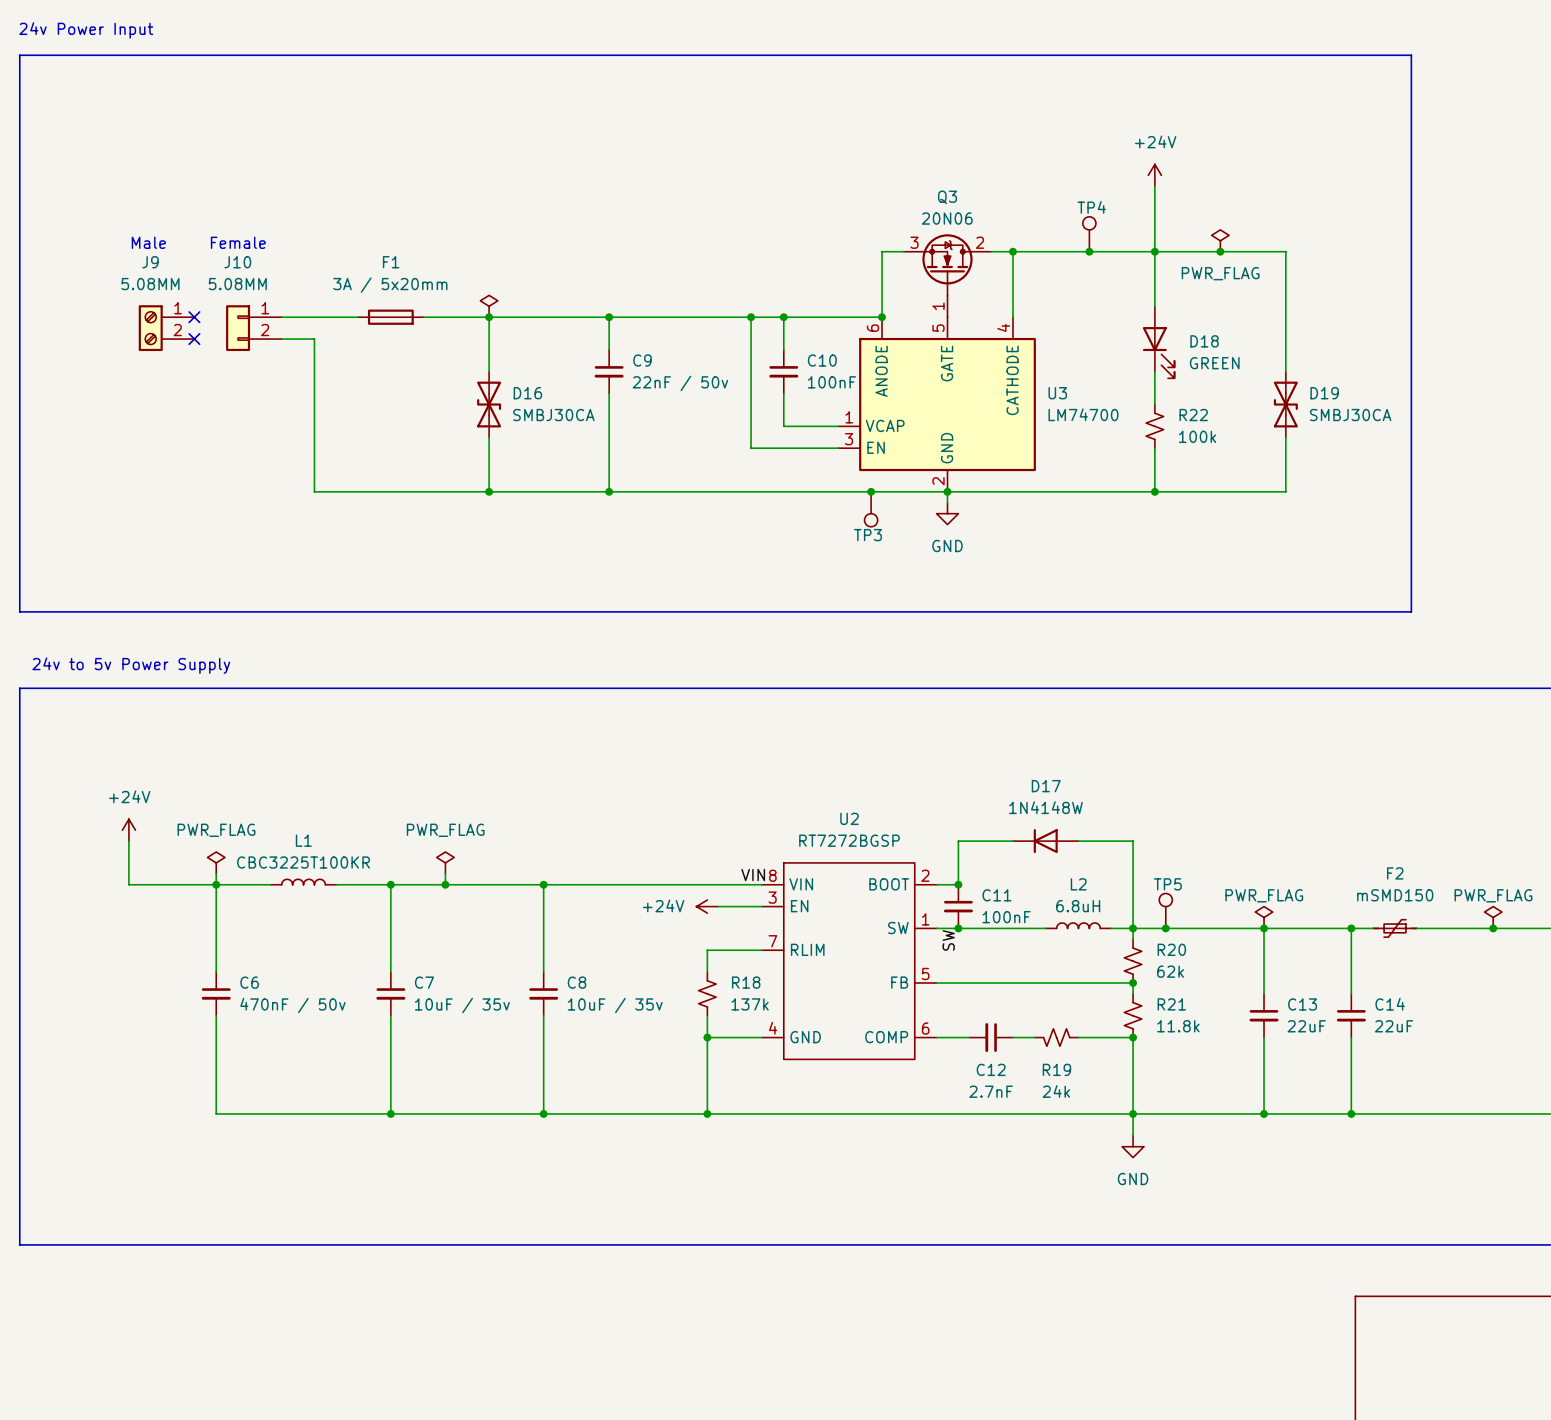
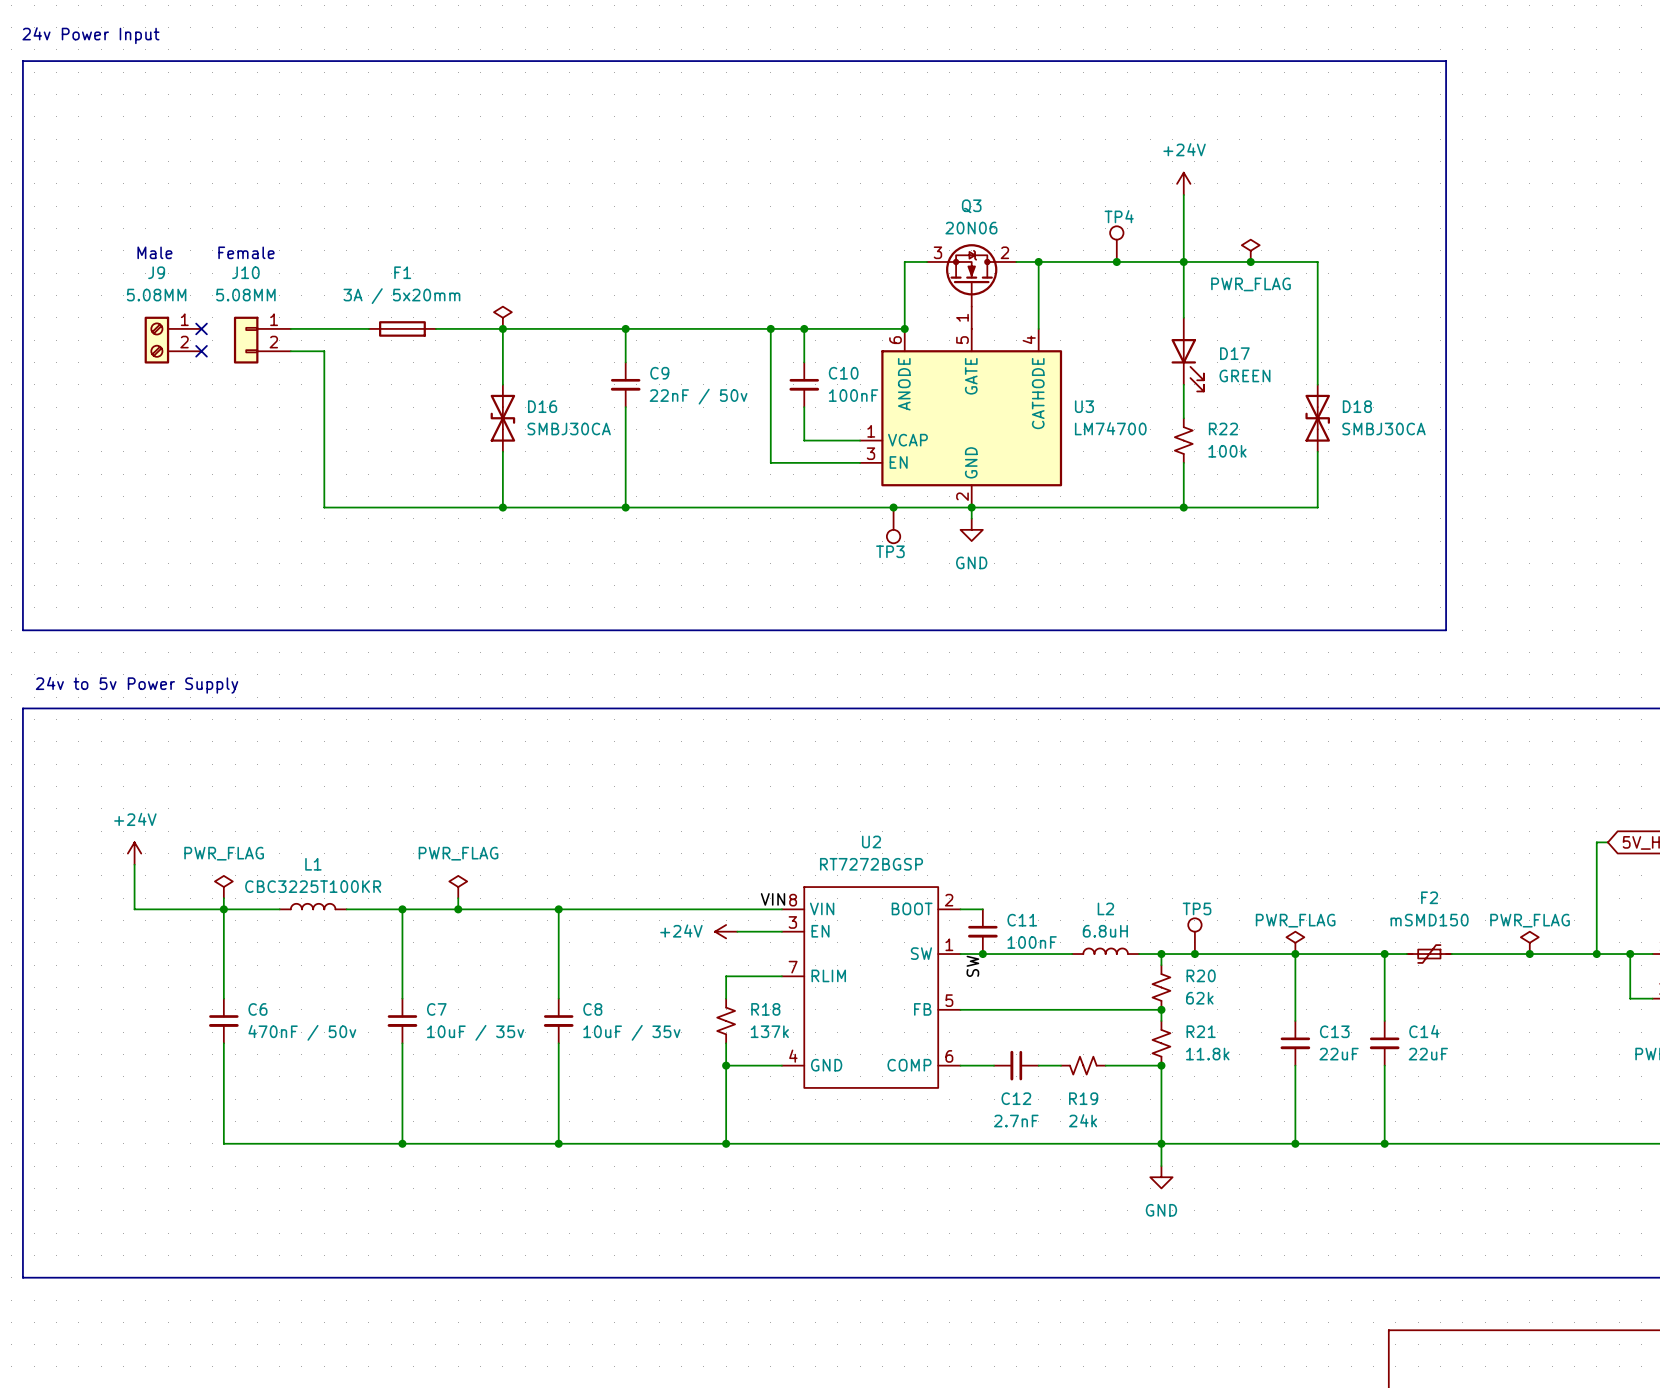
D18 name: D18 (1204, 341) -> D17 (1234, 353)
D19 name: D19 (1324, 393) -> D18 (1357, 406)
wire: (1012, 841) (958, 841) (958, 884) -> none
D17: 1N4148W (1045, 841) -> none
wire: (1078, 841) (1133, 841) (1133, 928) -> none
junction: (958, 884) -> none

